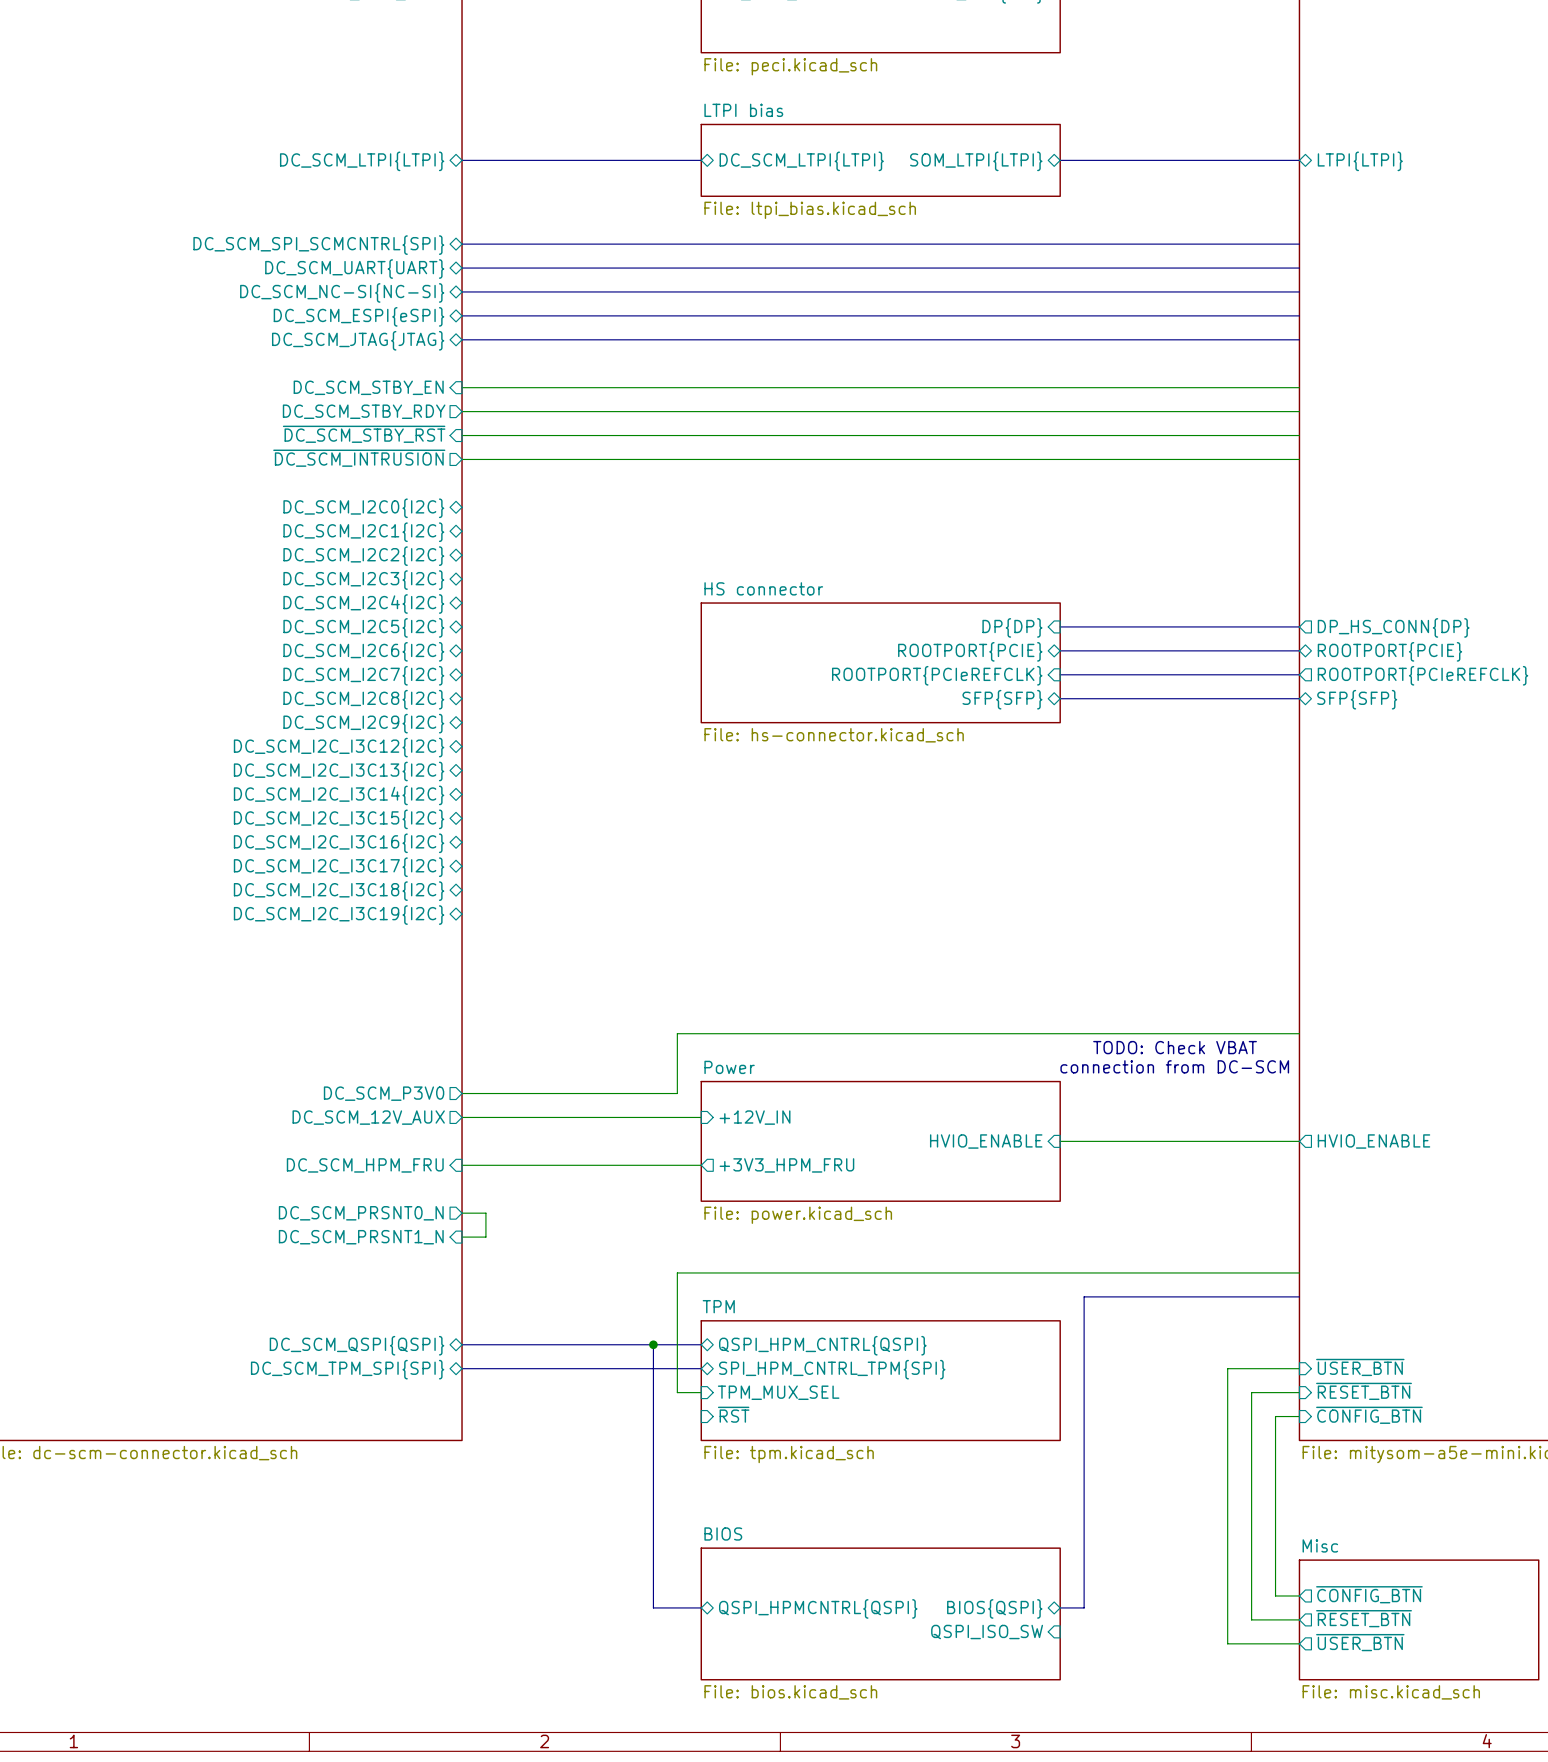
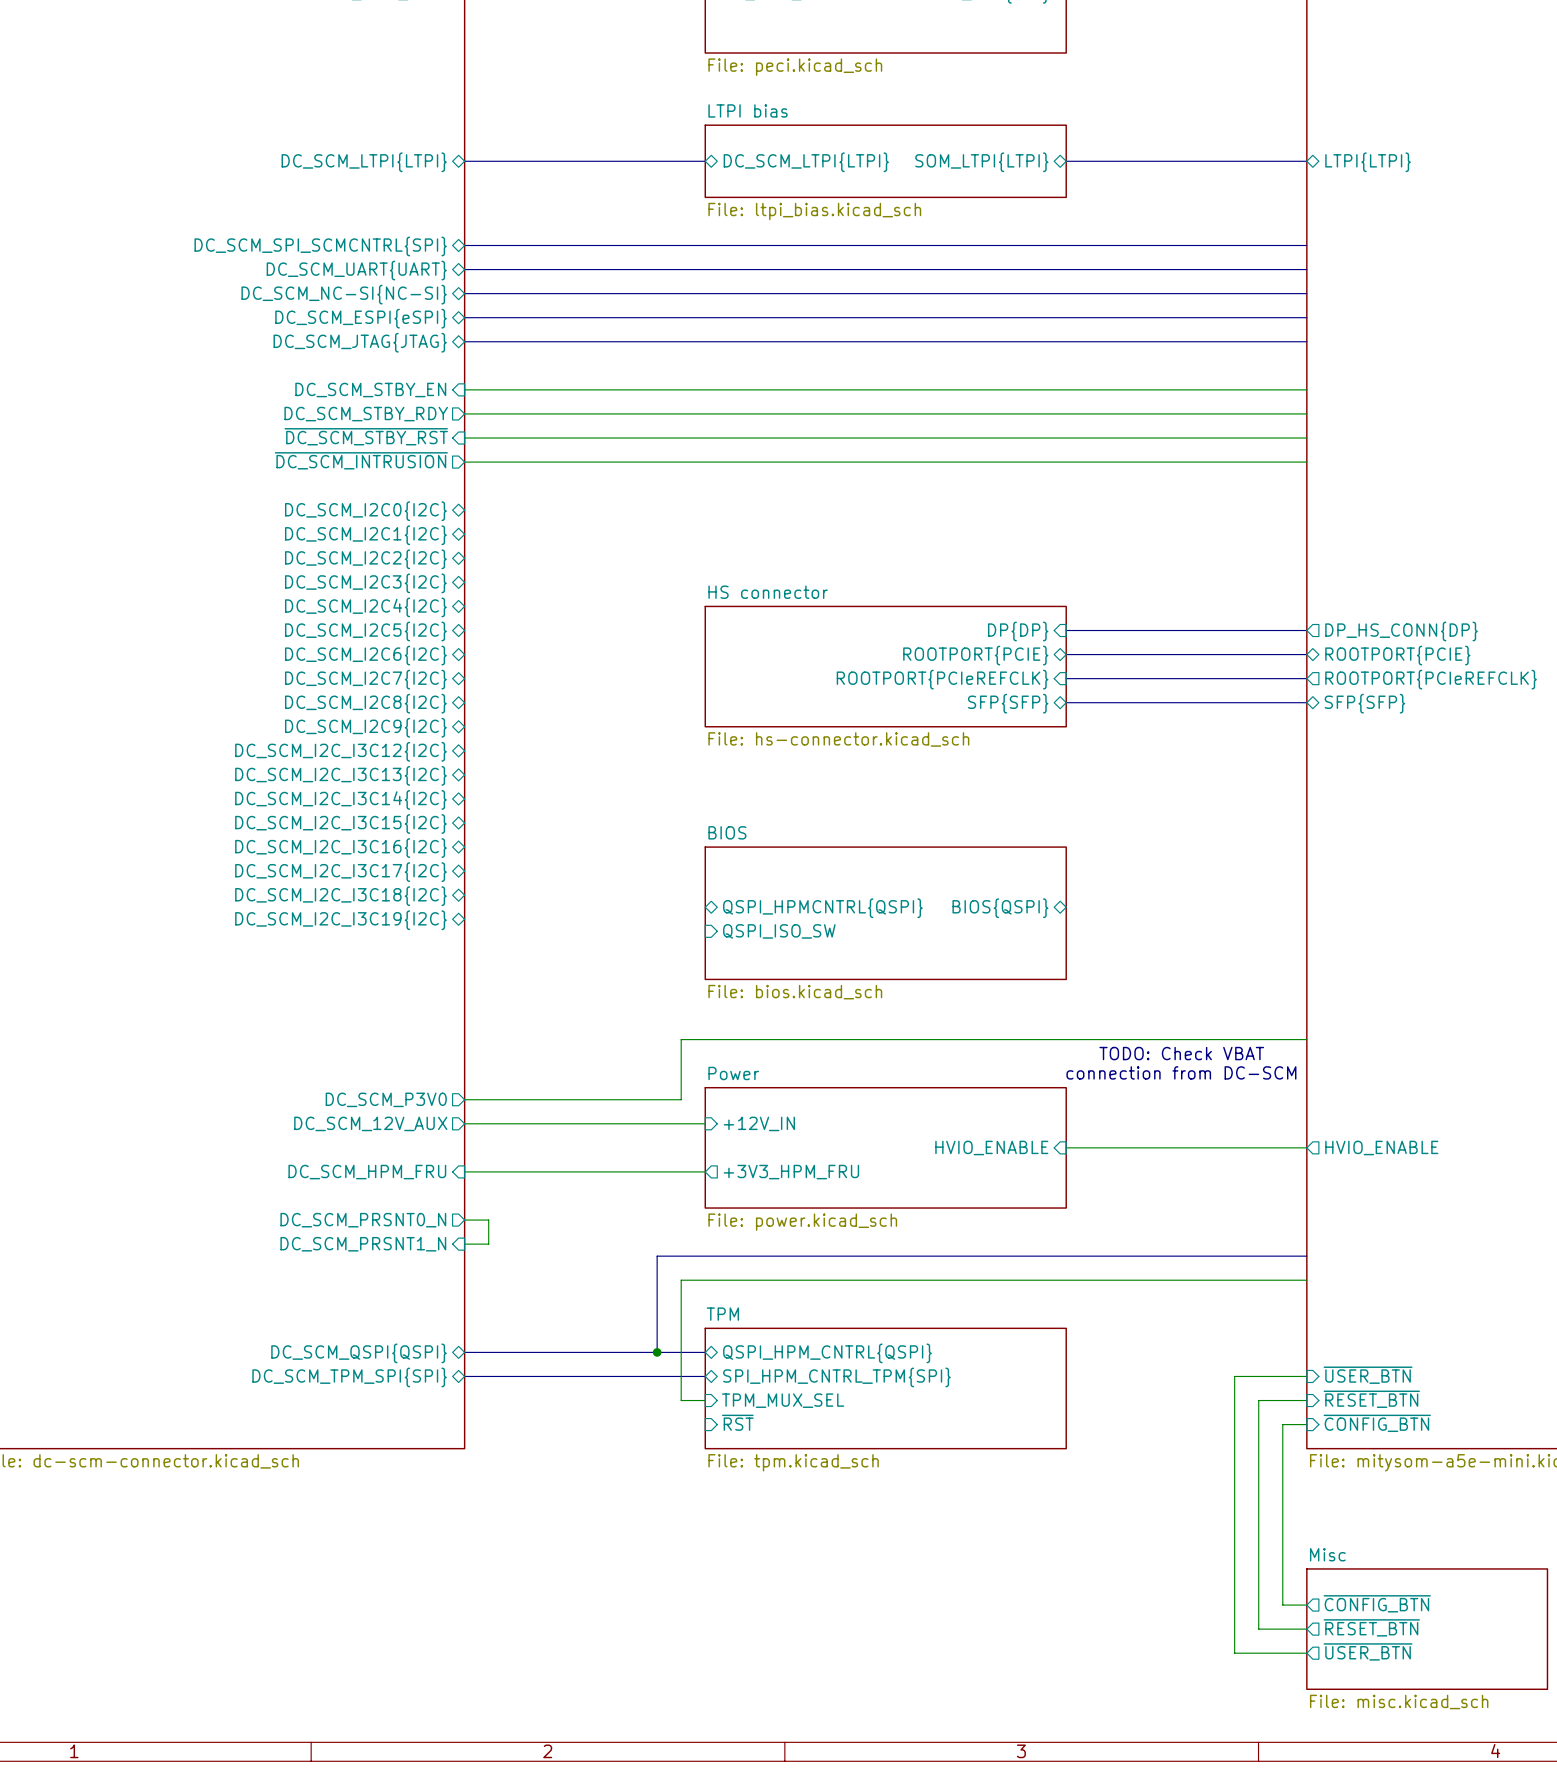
sheet pin: none -> QSPI_HPMCNTRL{QSPI} (822, 908)
sheet pin: none -> BIOS{QSPI} (1000, 908)
sheet BIOS: none -> File: bios.kicad_sch (885, 913)
sheet pin: none -> QSPI_ISO_SW (779, 931)
bus: (1299, 1296) (1084, 1296) (1084, 1607) (1060, 1607) -> none
bus: (653, 1344) (653, 1607) (701, 1607) -> (657, 1352) (657, 1256) (1306, 1256)
sheet pin: QSPI_HPMCNTRL{QSPI} (818, 1608) -> none
sheet pin: BIOS{QSPI} (994, 1608) -> none
sheet BIOS: File: bios.kicad_sch (880, 1613) -> none
sheet pin: QSPI_ISO_SW (987, 1632) -> none

